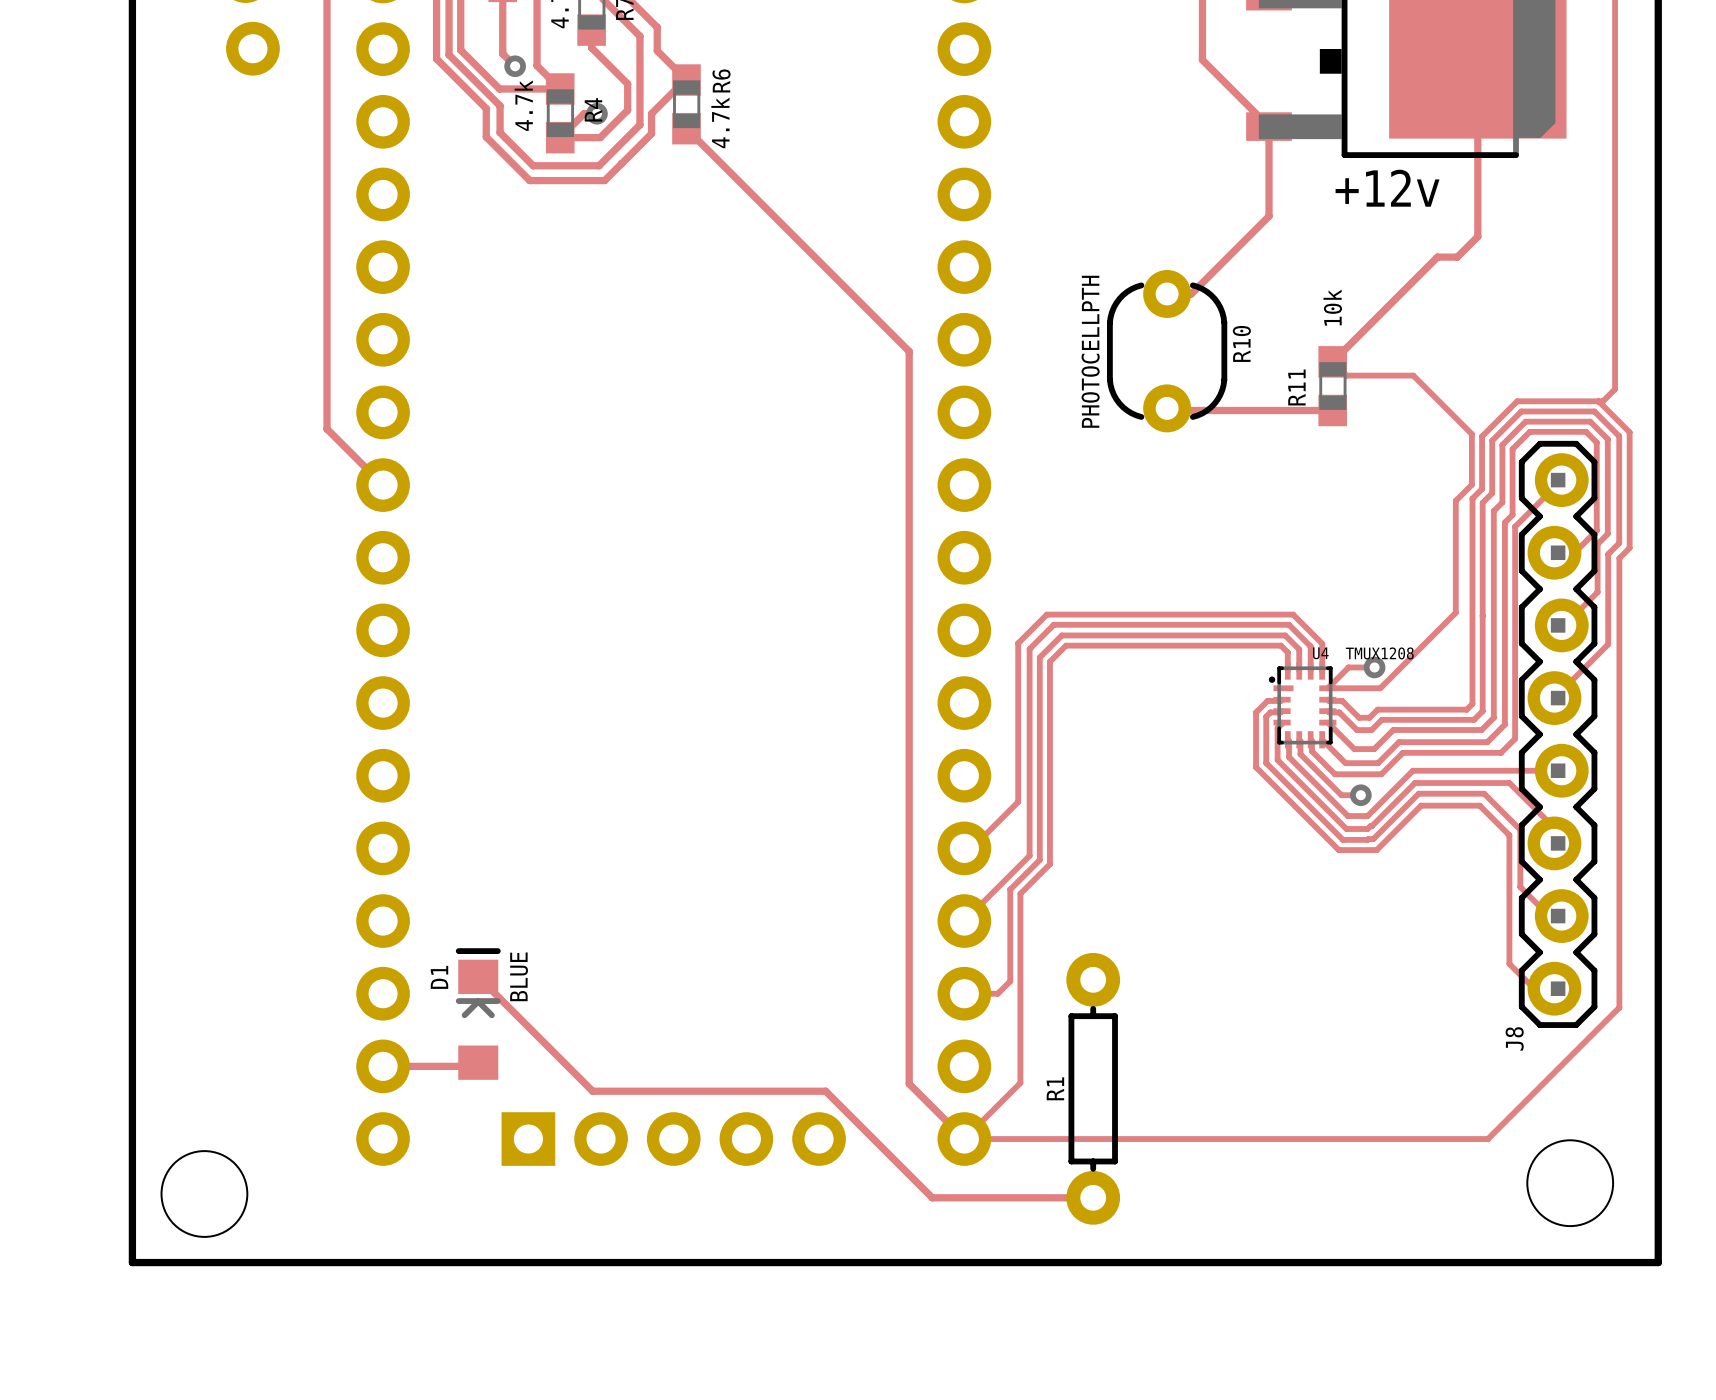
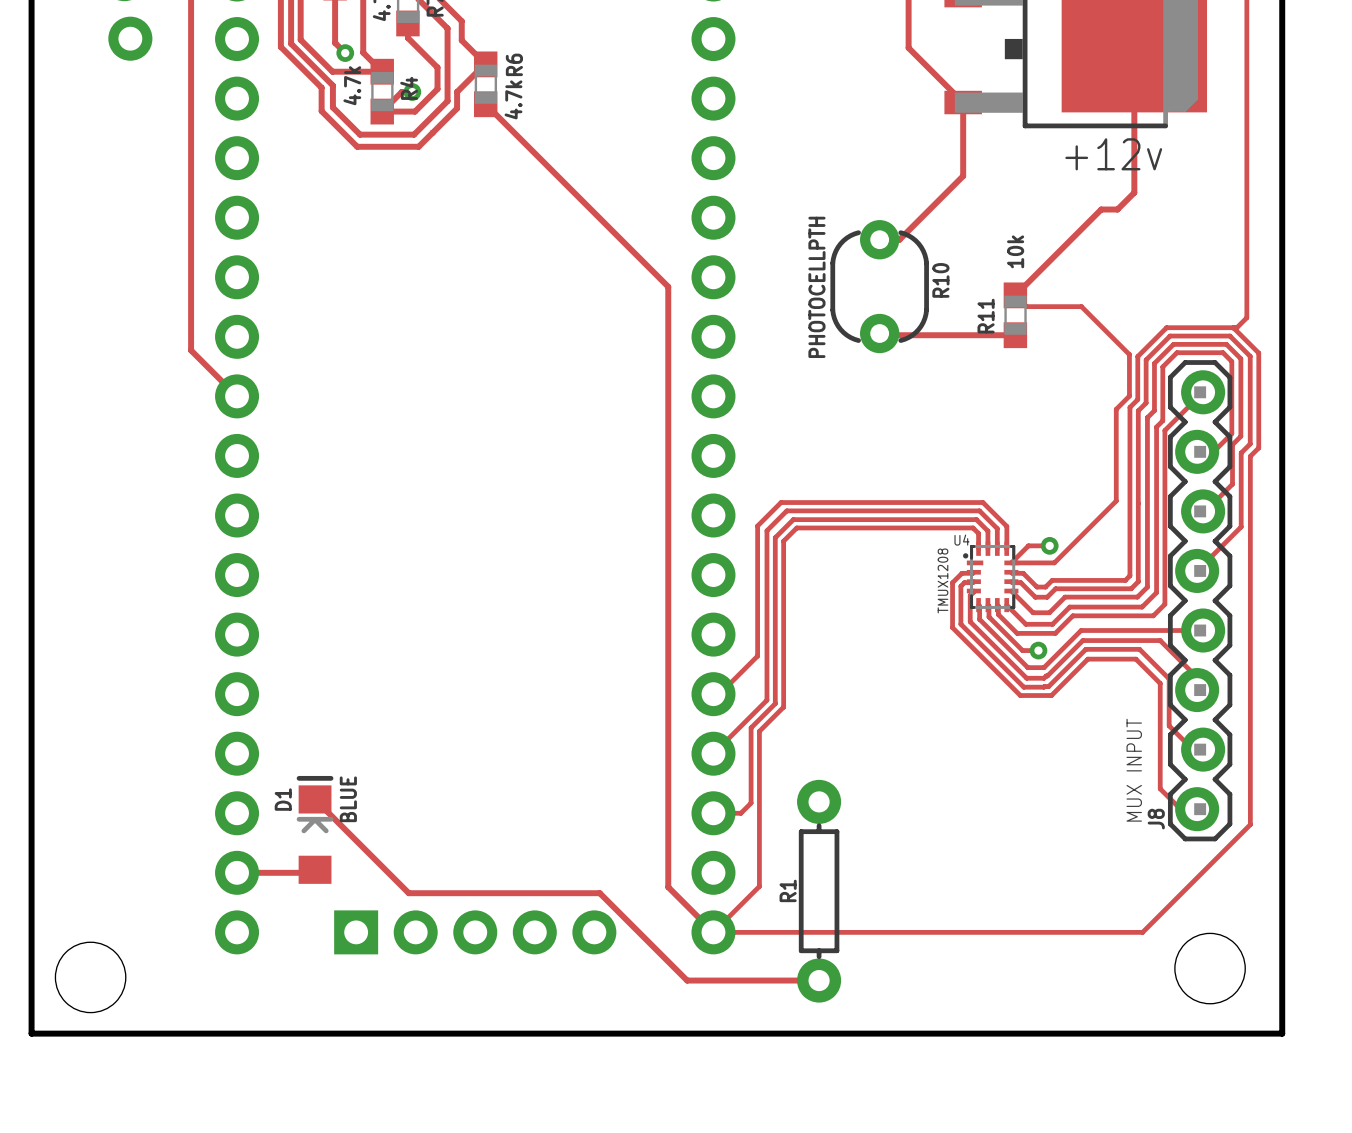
part value position: +12v (1387, 188) -> +12v (1113, 154)
U4 name position: U4 (1320, 653) -> U4 (961, 540)
U4 value rotation: 0° (1379, 653) -> 90° counterclockwise (942, 580)
U4 value position: TMUX1208 (1379, 653) -> TMUX1208 (942, 580)
text: none -> MUX INPUT (1134, 770)
J8 name position: J8 (1514, 1038) -> J8 (1156, 819)

